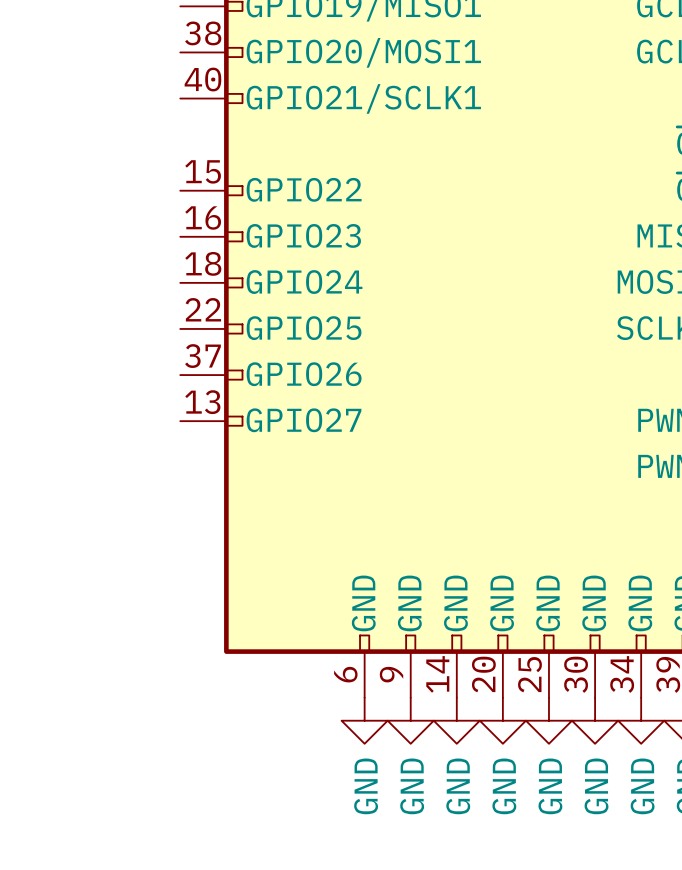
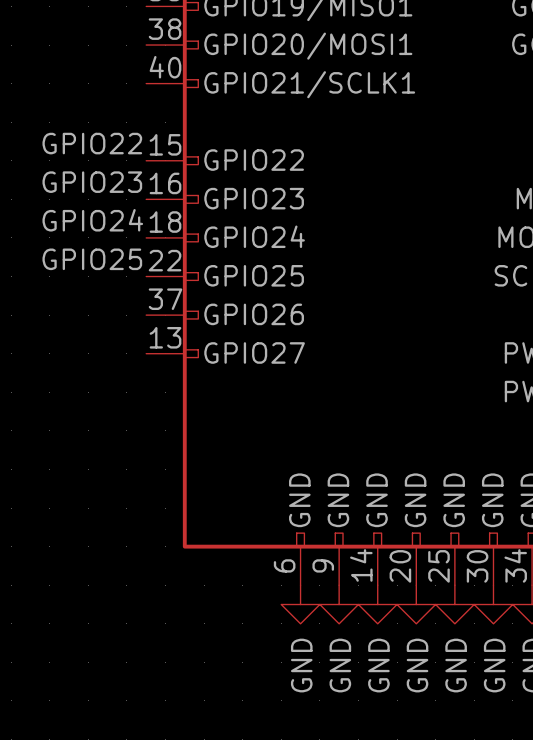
label: none -> GPIO22 (92, 143)
label: none -> GPIO23 (92, 182)
label: none -> GPIO24 (92, 220)
label: none -> GPIO25 (92, 259)

